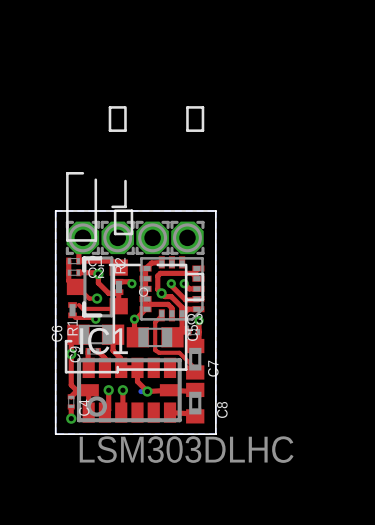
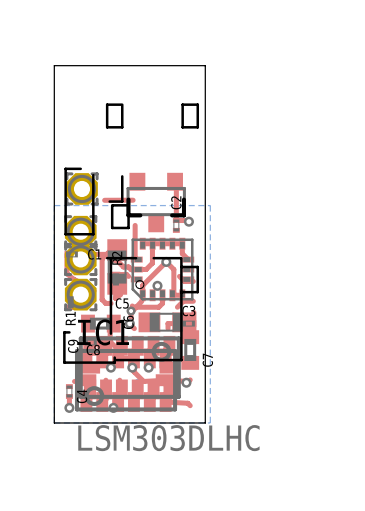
top track: none -> (175, 181) (176, 178) (176, 220) (188, 221)
part: none -> (81, 188)
top track: none -> (104, 200) (133, 200)
board edge: (55, 210) (215, 210) (215, 434) (210, 434) -> (54, 205) (54, 65) (205, 65) (205, 422)
via: none -> (188, 221)
top track: none -> (135, 225) (135, 257) (136, 259)
part: (117, 237) -> none
part: (152, 237) -> none
part: (187, 237) -> none
top track: none -> (142, 243) (182, 243) (182, 253) (188, 259)
top track: none -> (152, 243) (152, 263) (146, 269) (131, 269) (128, 266) (123, 266) (117, 260) (117, 250) (110, 250) (102, 258) (102, 299) (105, 303) (111, 303)
top track: (161, 262) (151, 263) (145, 268) (145, 309) (150, 304) (168, 304) (171, 308) (171, 315) -> none
part: none -> (80, 259)
via: none -> (166, 261)
top track: (198, 268) (193, 274) (198, 278) (193, 273) (160, 273) (157, 275) (157, 289) (164, 296) (171, 296) (182, 307) (182, 327) (186, 332) -> none
C2 rotation: 0° (73, 272) -> 90° clockwise (176, 225)
C2 position: (73, 272) -> (176, 225)
top track: (78, 272) (98, 274) -> none
top track: (98, 274) (98, 283) (108, 293) (119, 293) -> none
via: (98, 274) -> none
via: (131, 283) -> none
top track: (171, 283) (169, 283) (185, 299) (198, 299) -> none
via: (171, 283) -> none
via: (184, 283) -> none
part rotation: 0° (97, 286) -> 90° counterclockwise (156, 202)
part position: (97, 286) -> (156, 202)
part rotation: 0° (171, 288) -> 90° clockwise (162, 269)
via: (97, 298) -> none
part: none -> (80, 294)
top track: none -> (142, 295) (142, 285) (166, 261) (173, 269) (172, 295) (182, 295)
top track: none -> (162, 295) (162, 303) (158, 307) (132, 305)
top track: (78, 304) (82, 308) (117, 308) (118, 306) -> none
top track: (161, 315) (155, 322) (155, 350) (159, 352) (179, 352) (195, 368) (195, 372) -> none
top track: (75, 317) (95, 319) -> none
via: (95, 319) -> none
via: (199, 320) -> none
via: none -> (129, 323)
top track: (78, 334) (71, 341) (71, 385) (77, 390) (71, 396) -> none
C6 position: (95, 334) -> (166, 322)
C5 rotation: 0° (155, 337) -> 90° clockwise (117, 266)
C5 position: (155, 337) -> (117, 266)
via: (71, 354) -> none
via: none -> (110, 367)
part: none -> (129, 367)
via: none -> (132, 367)
via: none -> (148, 367)
via: (108, 390) -> none
via: (122, 390) -> none
via: (147, 391) -> none
via: none -> (186, 382)
C8 rotation: 0° (195, 403) -> 90° clockwise (100, 323)
C8 position: (195, 403) -> (100, 323)
via: none -> (113, 407)

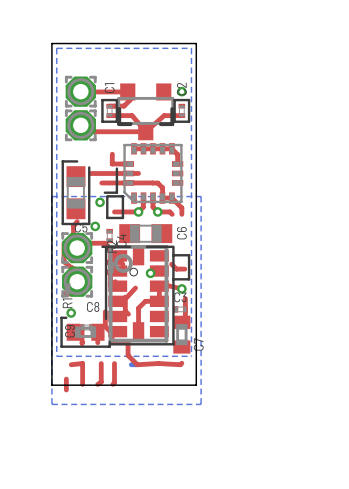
bottom zone outline: none -> (56, 48) (191, 48) (191, 356) (56, 356) (56, 48)
board edge: (54, 65) (205, 65) -> (51, 62) (51, 43) (196, 43) (196, 62)
top track: none -> (80, 91) (76, 91) (127, 91) (130, 100) (124, 106) (109, 106)
part: none -> (80, 91)
via: none -> (181, 91)
top track: none -> (109, 115) (132, 115) (145, 131)
top track: none -> (181, 115) (164, 115) (145, 131)
part: none -> (80, 125)
top track: none -> (87, 131) (145, 131)
top track: none -> (134, 148) (171, 148) (177, 154) (177, 163)
top track: none -> (112, 154) (112, 163) (128, 163)
top track: none -> (90, 173) (138, 173)
top track: (175, 181) (176, 178) (176, 220) (188, 221) -> none
part: (81, 188) -> none
top track: none -> (101, 183) (152, 182)
top track: none -> (152, 183) (157, 183) (162, 187) (162, 197)
top track: (104, 200) (133, 200) -> none
part position: (156, 202) -> (145, 111)
top track: none -> (143, 198) (143, 207) (138, 211) (114, 211)
top track: none -> (152, 198) (152, 207) (157, 211) (169, 211) (172, 214)
top track: none -> (162, 198) (171, 198) (181, 208) (181, 214)
via: none -> (100, 202)
via: none -> (138, 211)
via: none -> (157, 211)
via: (188, 221) -> none
top track: (135, 225) (135, 257) (136, 259) -> none
C2 position: (176, 225) -> (181, 110)
part: (80, 231) -> none
via: none -> (95, 226)
top track: (142, 243) (182, 243) (182, 253) (188, 259) -> none
top track: (152, 243) (152, 263) (146, 269) (131, 269) (128, 266) (123, 266) (117, 260) (117, 250) (110, 250) (102, 258) (102, 299) (105, 303) (111, 303) -> none
C1 rotation: 0° (71, 254) -> 90° clockwise (109, 110)
C1 position: (71, 254) -> (109, 110)
via: (166, 261) -> none
C5 position: (117, 266) -> (75, 192)
part position: (162, 269) -> (152, 173)
top track: (142, 295) (142, 285) (166, 261) (173, 269) (172, 295) (182, 295) -> none
top track: (162, 295) (162, 303) (158, 307) (132, 305) -> none
top track: (193, 301) (183, 301) (177, 307) -> none
top track: none -> (181, 288) (161, 284) (159, 286) (159, 301) (145, 301) (138, 308) (138, 331)
via: none -> (181, 288)
via: (131, 311) -> none
C6 name position: C6 (128, 322) -> C6 (181, 233)
C6 position: (166, 322) -> (145, 233)
C8 position: (100, 323) -> (85, 332)
via: (129, 323) -> none
top track: (183, 323) (168, 323) (168, 328) -> none
via: none -> (71, 313)
C8 name position: C8 (93, 350) -> C8 (93, 306)
via: (110, 367) -> none
part rotation: 0° (129, 367) -> 90° counterclockwise (138, 293)
part position: (129, 367) -> (138, 293)
via: (132, 367) -> none
via: (148, 367) -> none
IC1: LSM303DLHC (126, 380) -> none
via: (186, 382) -> none
C4 position: (69, 391) -> (109, 236)
board edge: (54, 402) (54, 422) (205, 422) (205, 402) -> (51, 385) (196, 385)
top track: (165, 402) (187, 403) (190, 405) -> none
via: (69, 407) -> none
via: (113, 407) -> none

